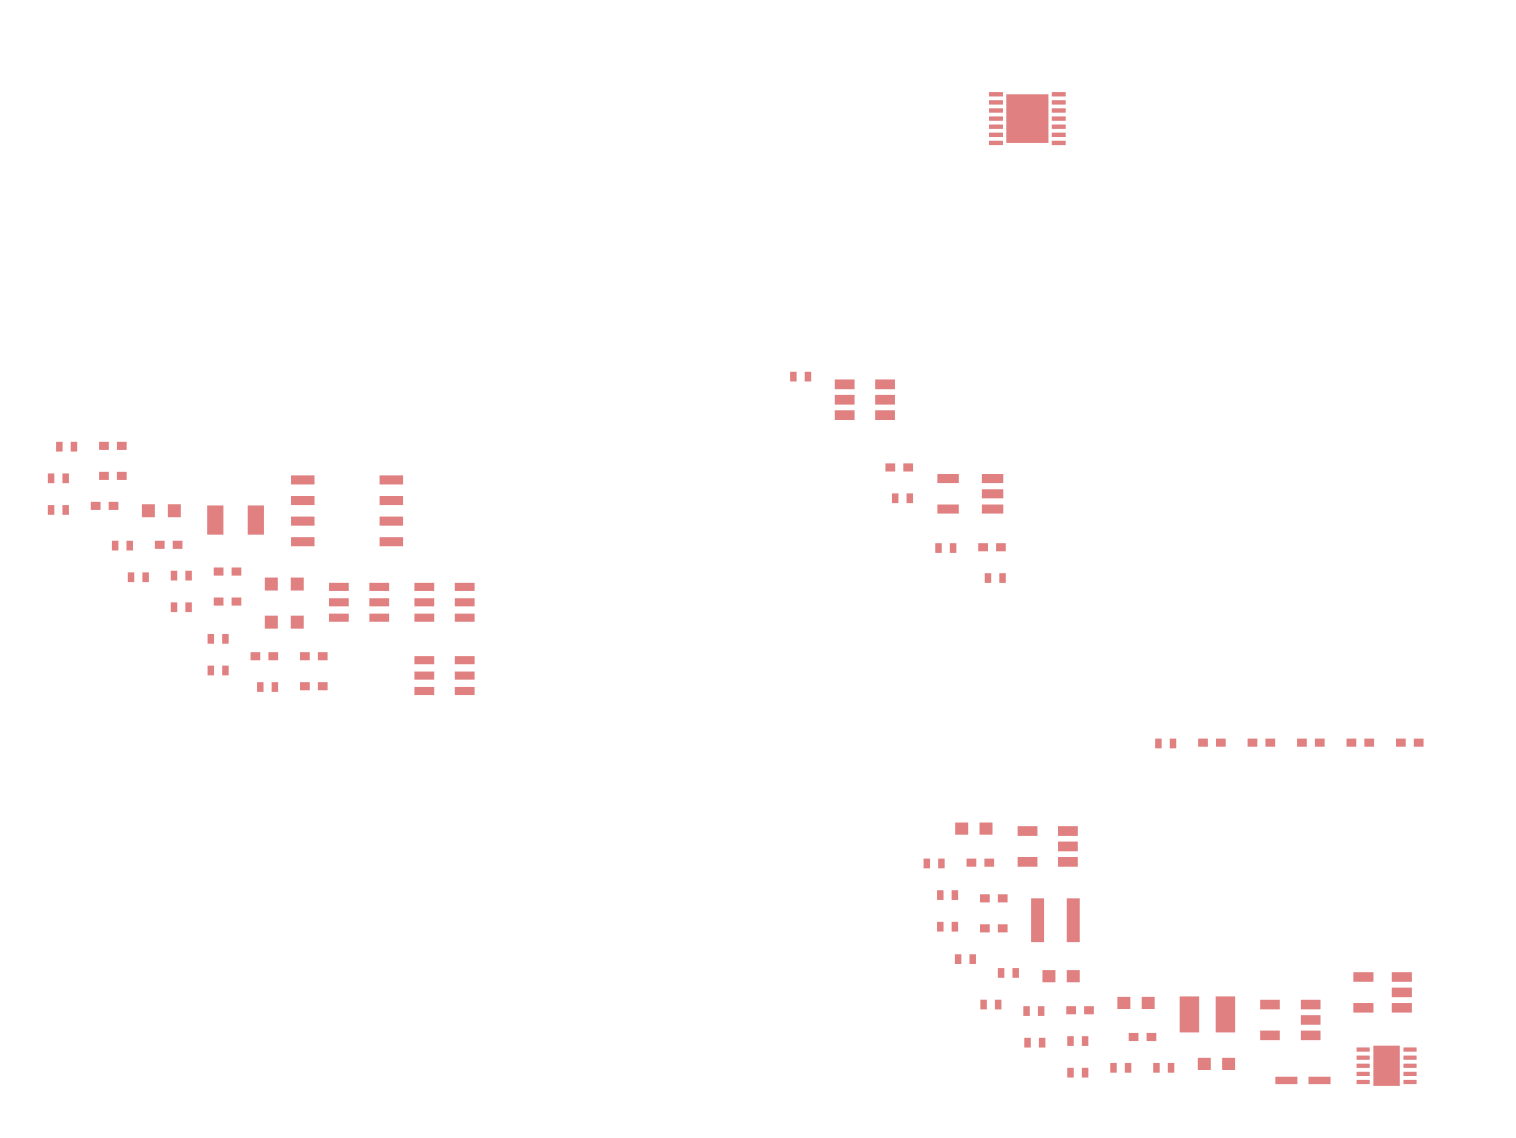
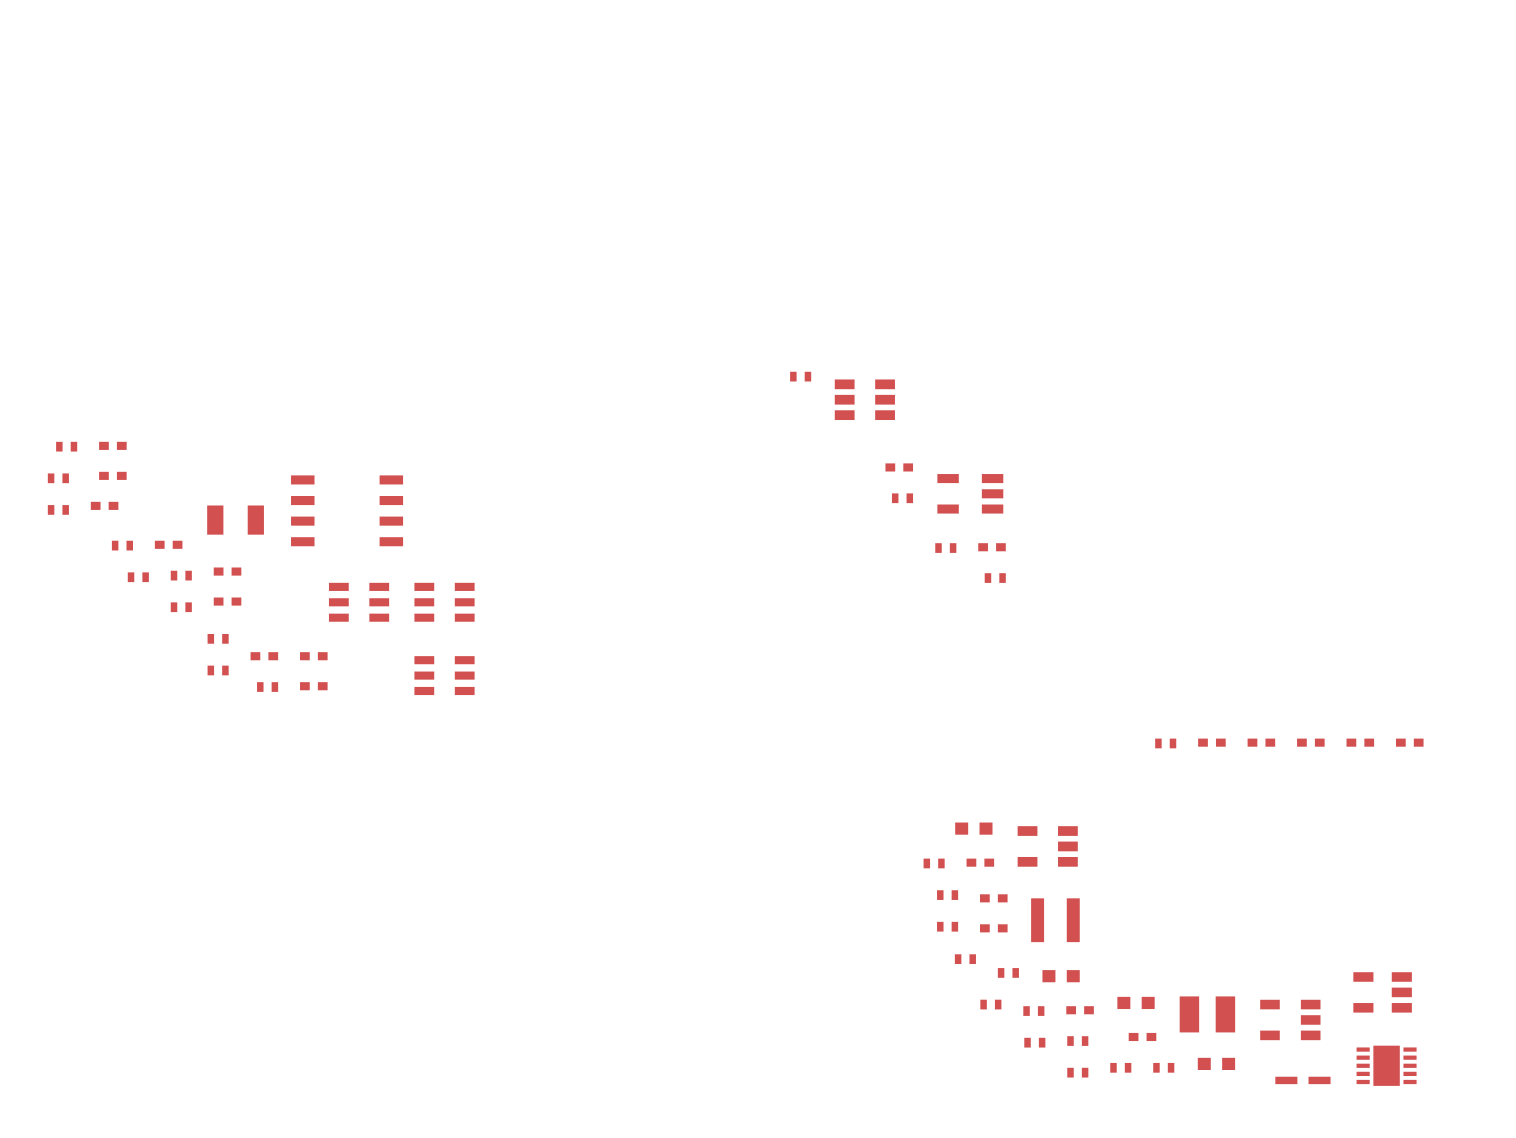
part: (1027, 118) -> none
part: (161, 510) -> none
part: (284, 584) -> none
part: (284, 622) -> none

